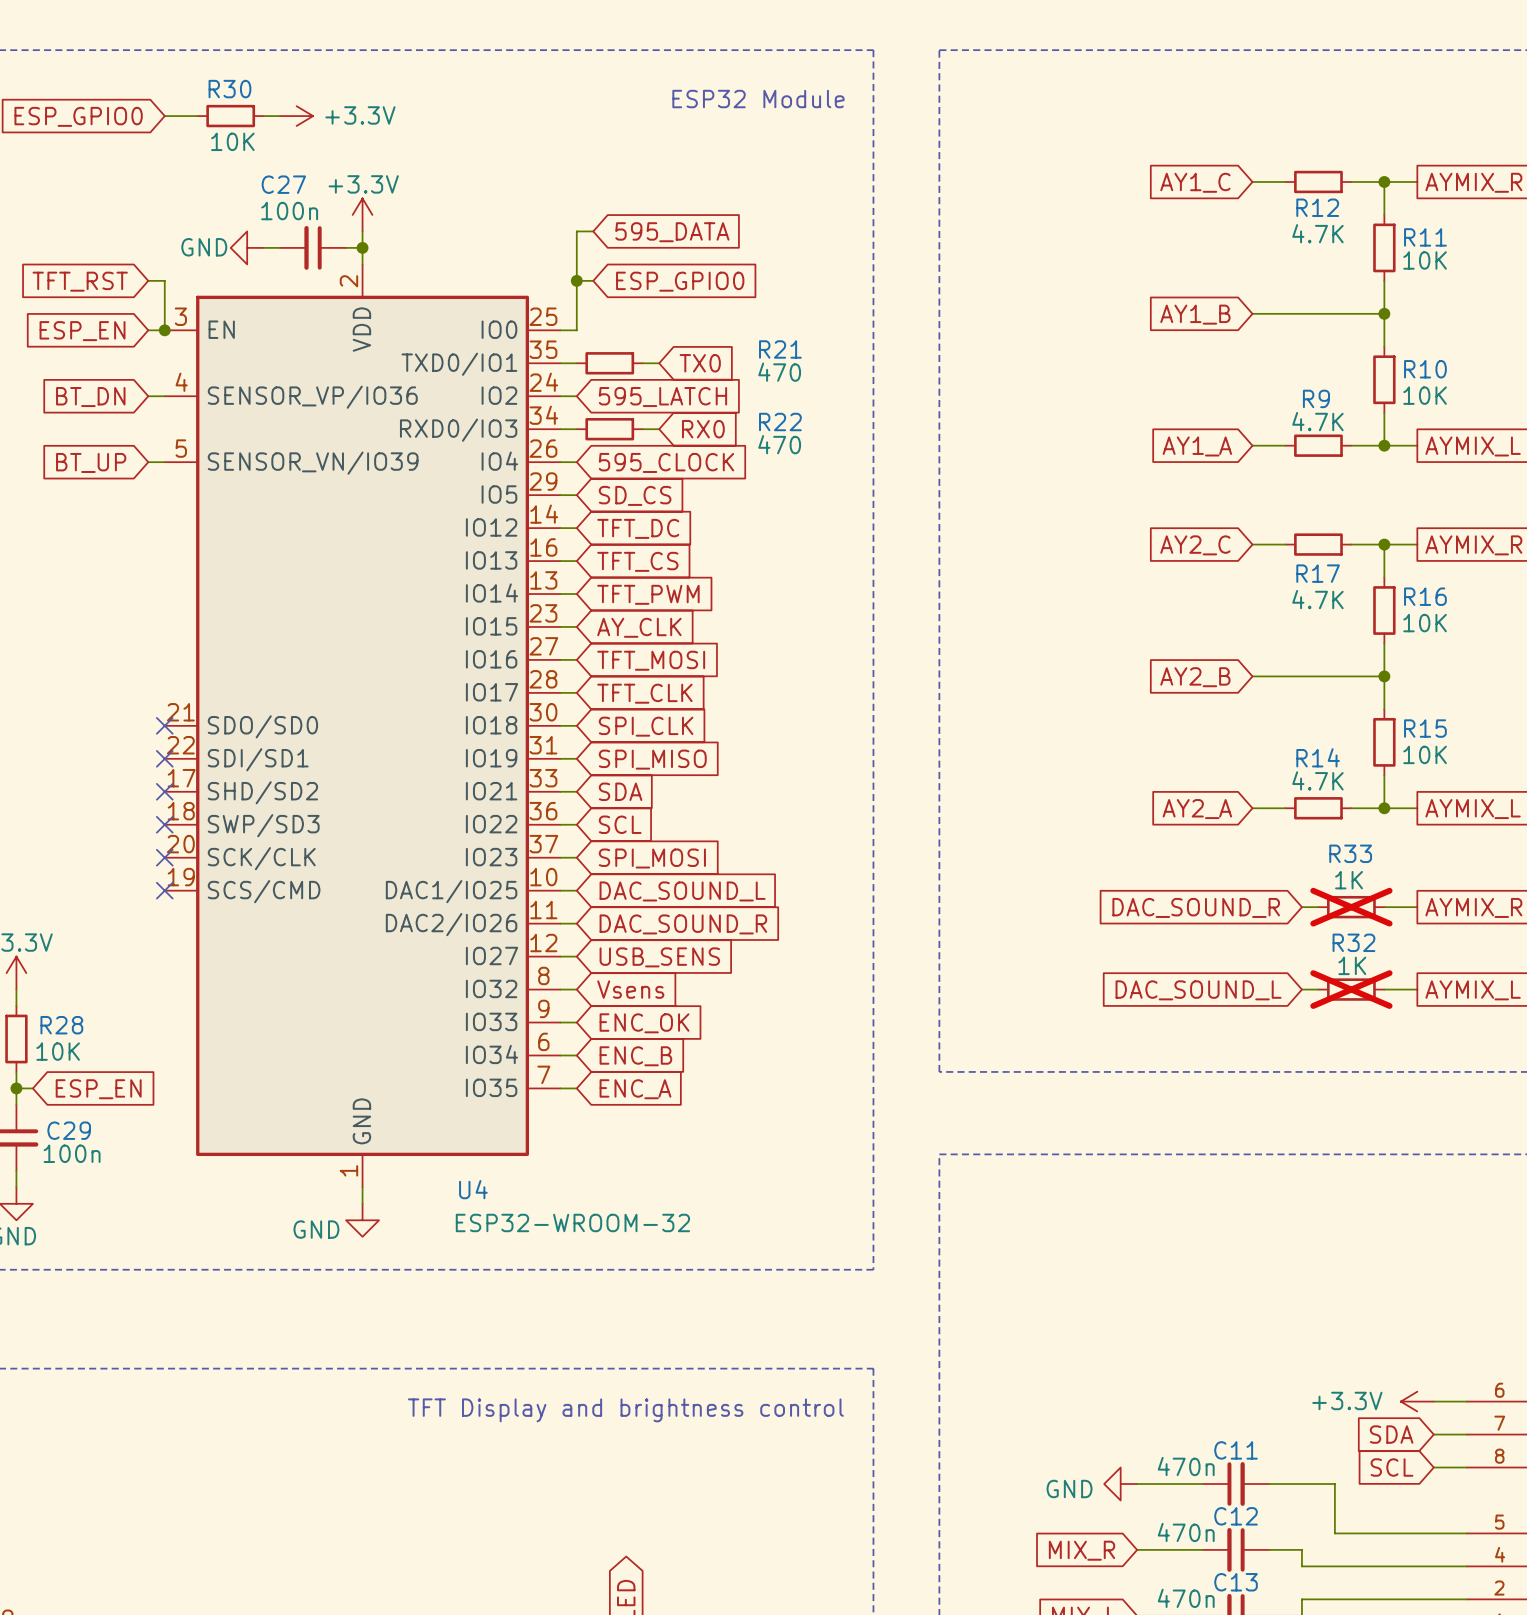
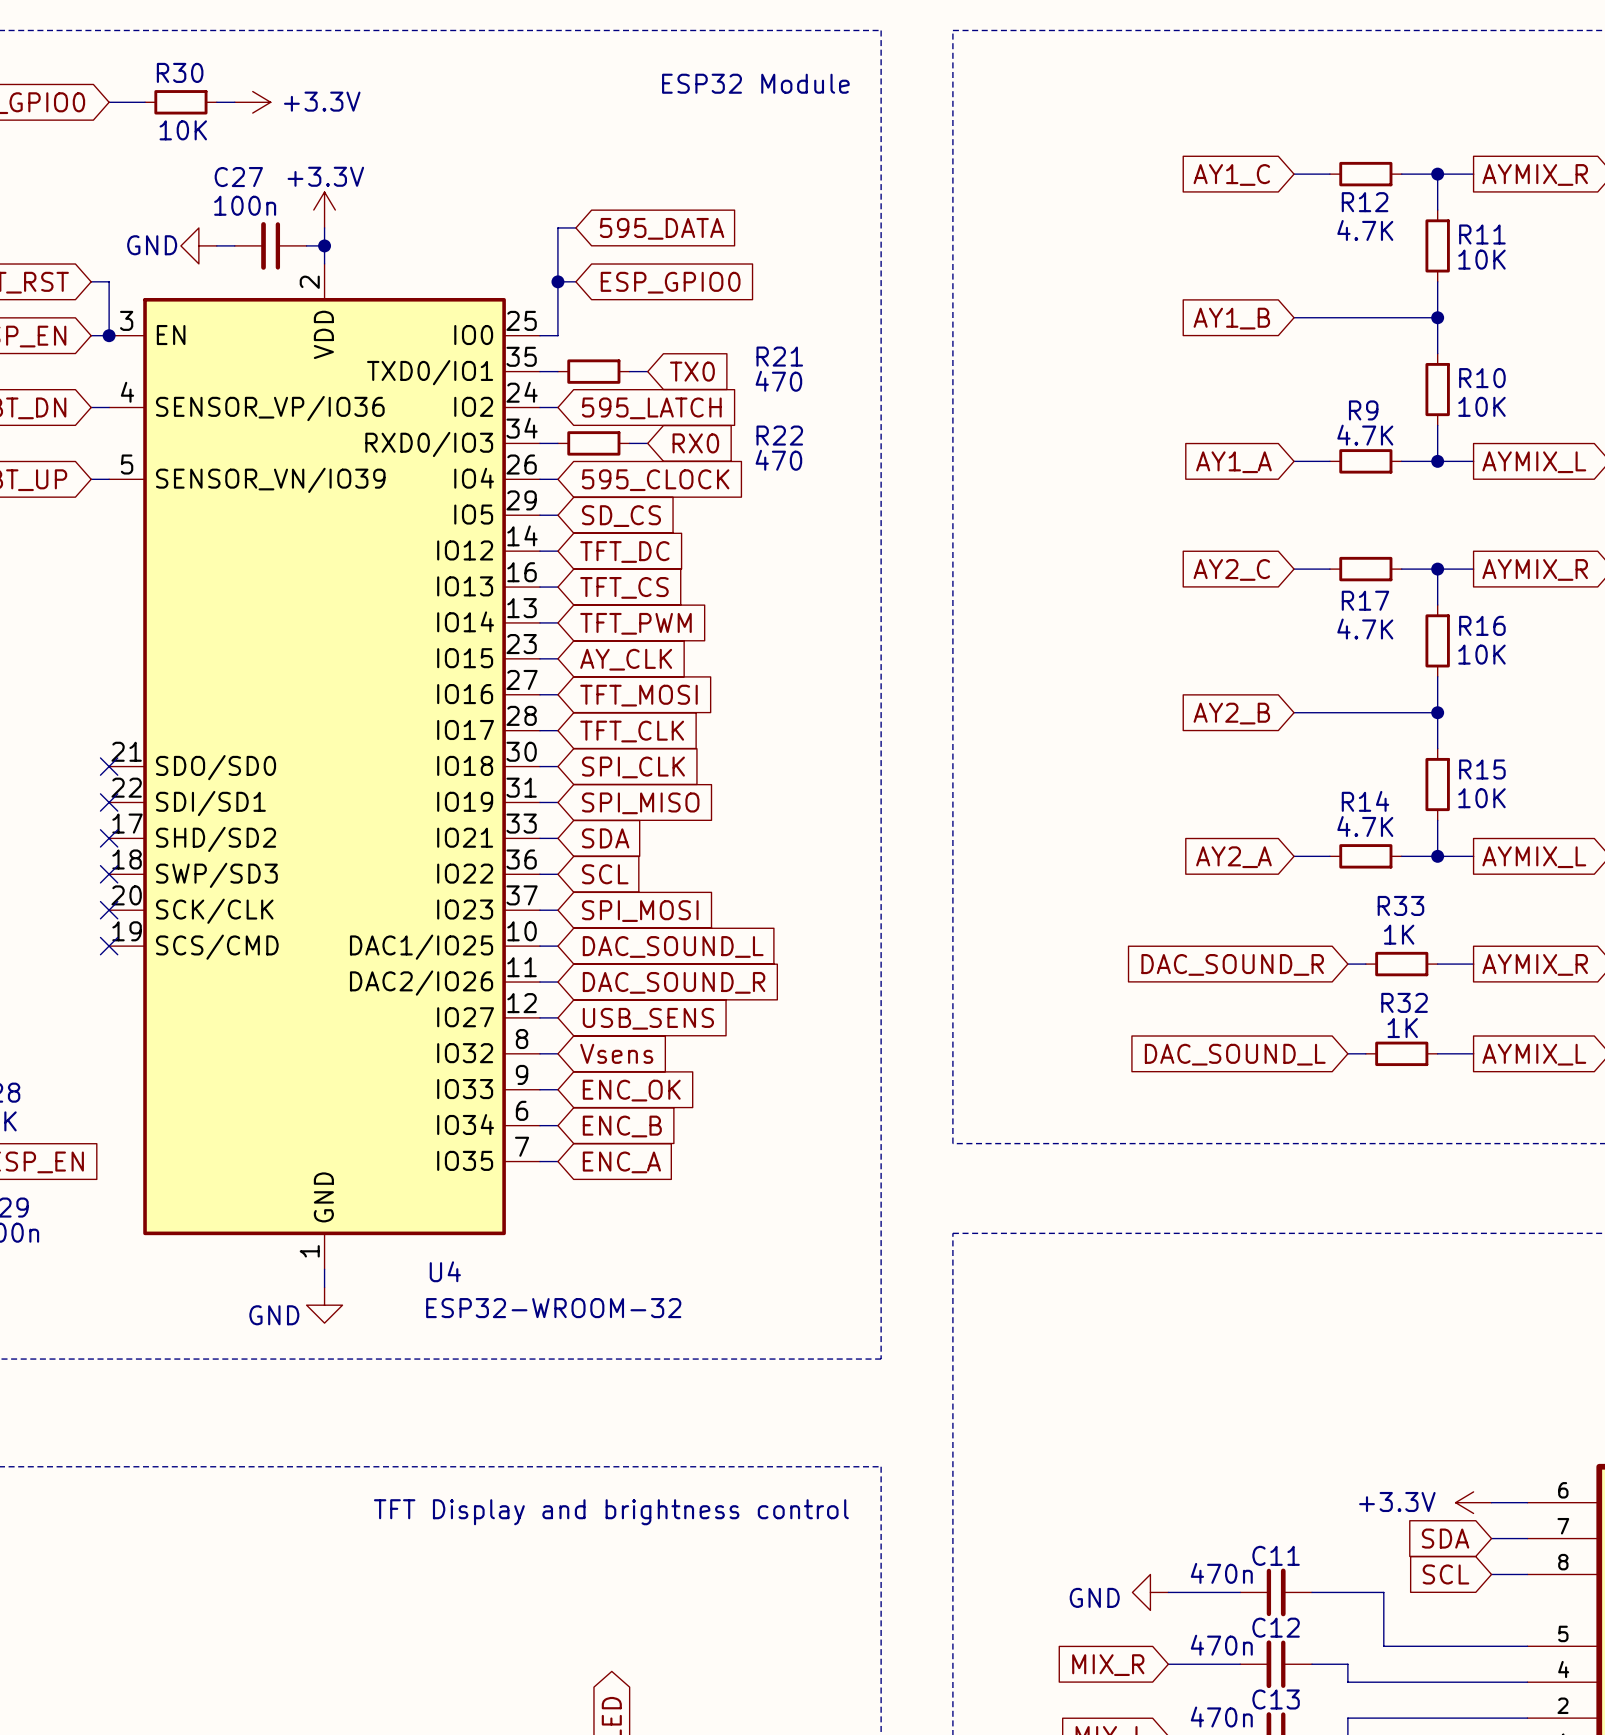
R33 do-not-place cross: (1351, 907) -> none
R32 do-not-place cross: (1351, 989) -> none

